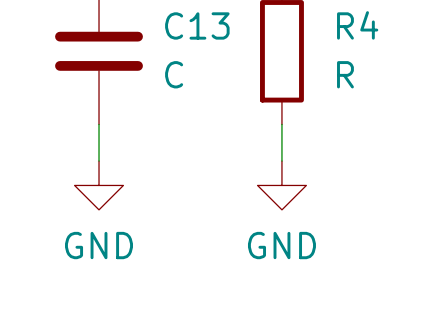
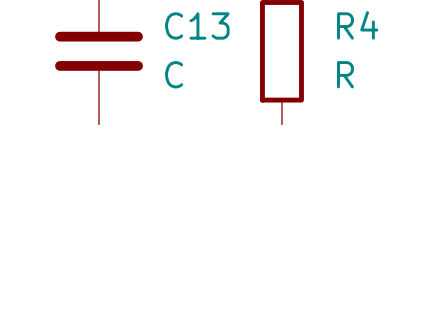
wire: (99, 124) (99, 161) -> none
wire: (281, 124) (281, 161) -> none
power symbol: GND (99, 185) -> none
power symbol: GND (281, 185) -> none

